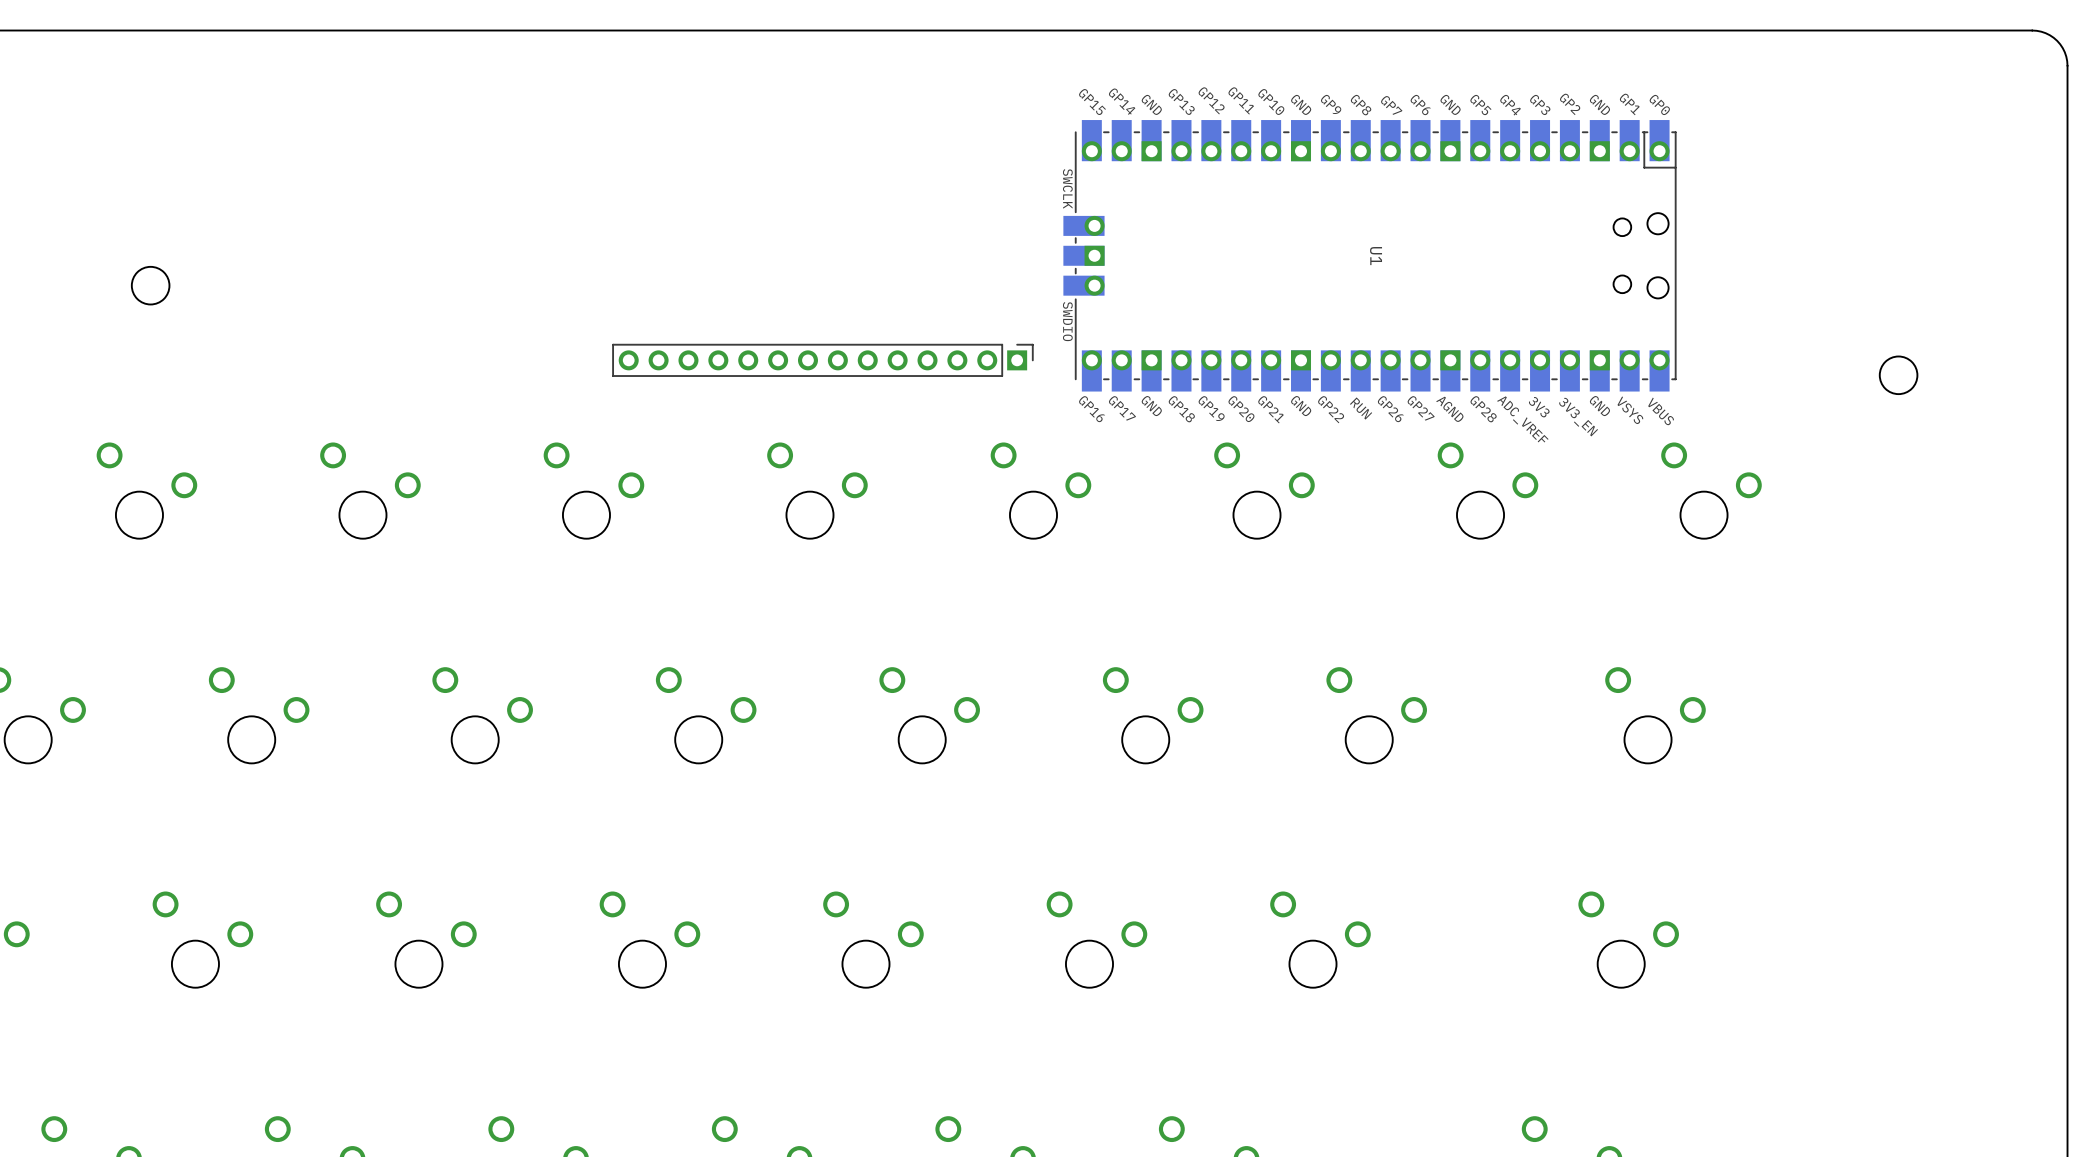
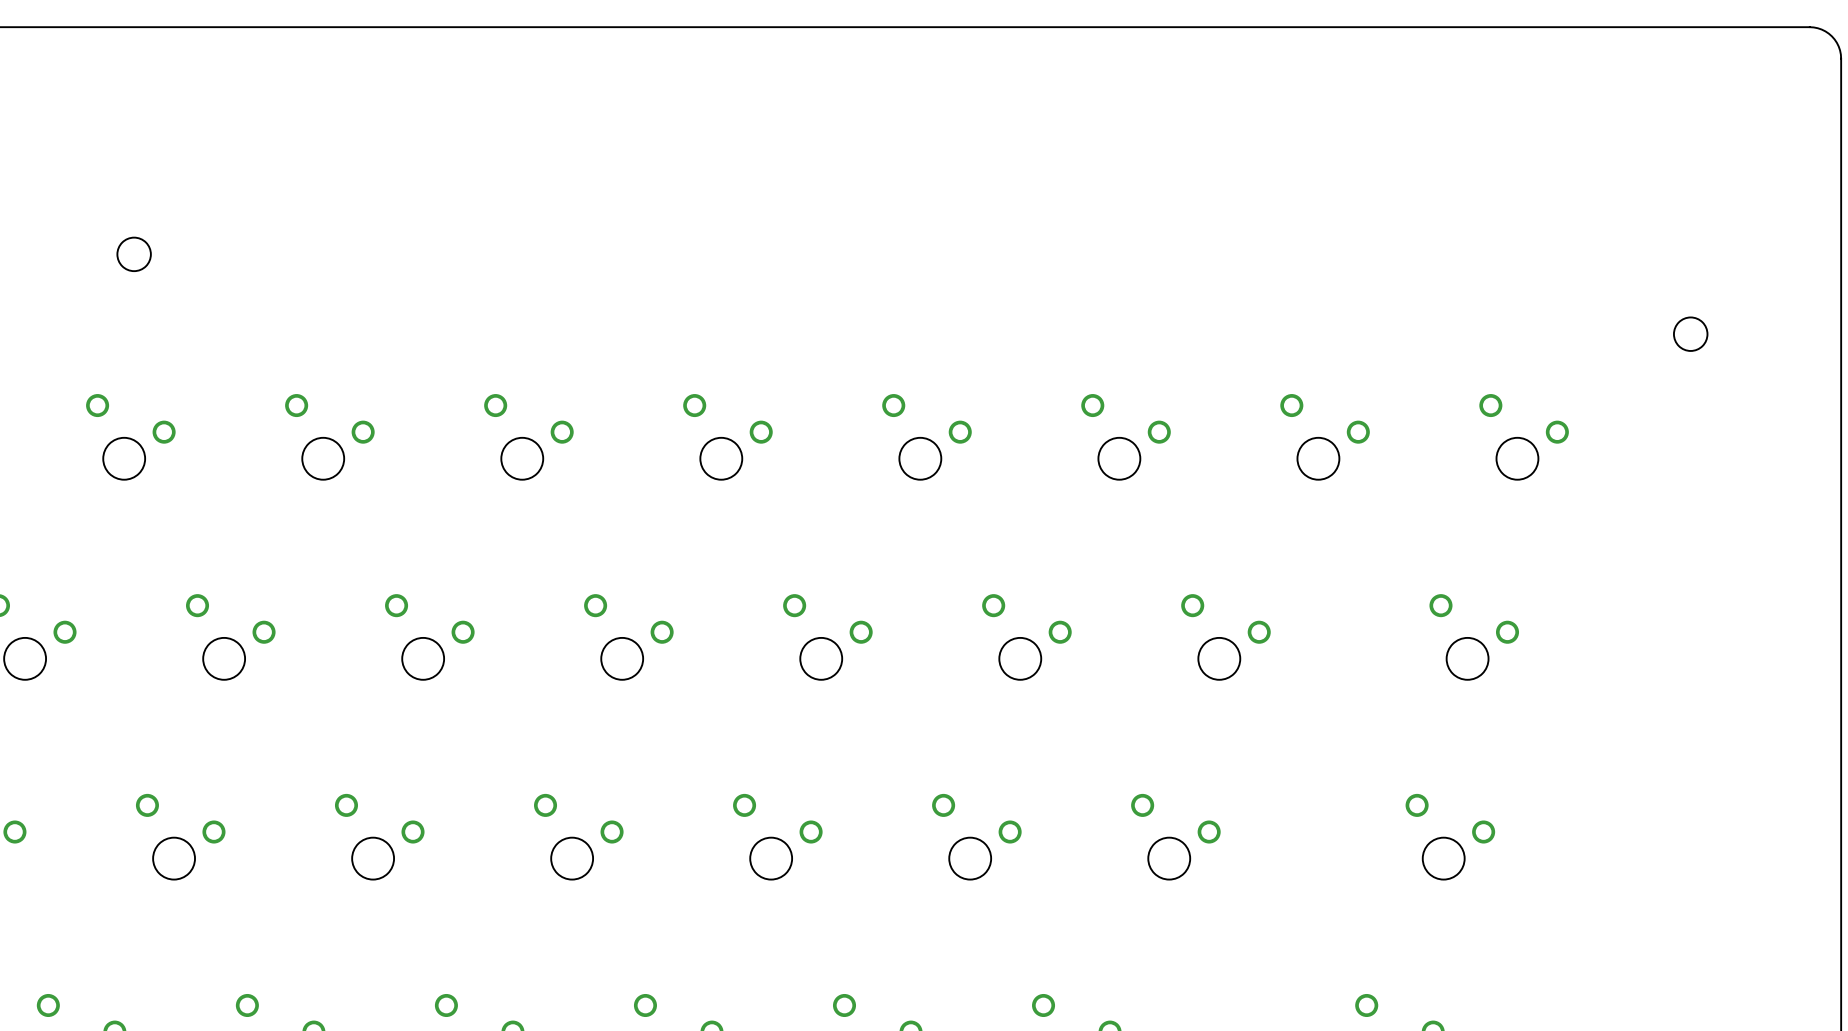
U1: (1369, 255) -> none
part: (822, 360) -> none

